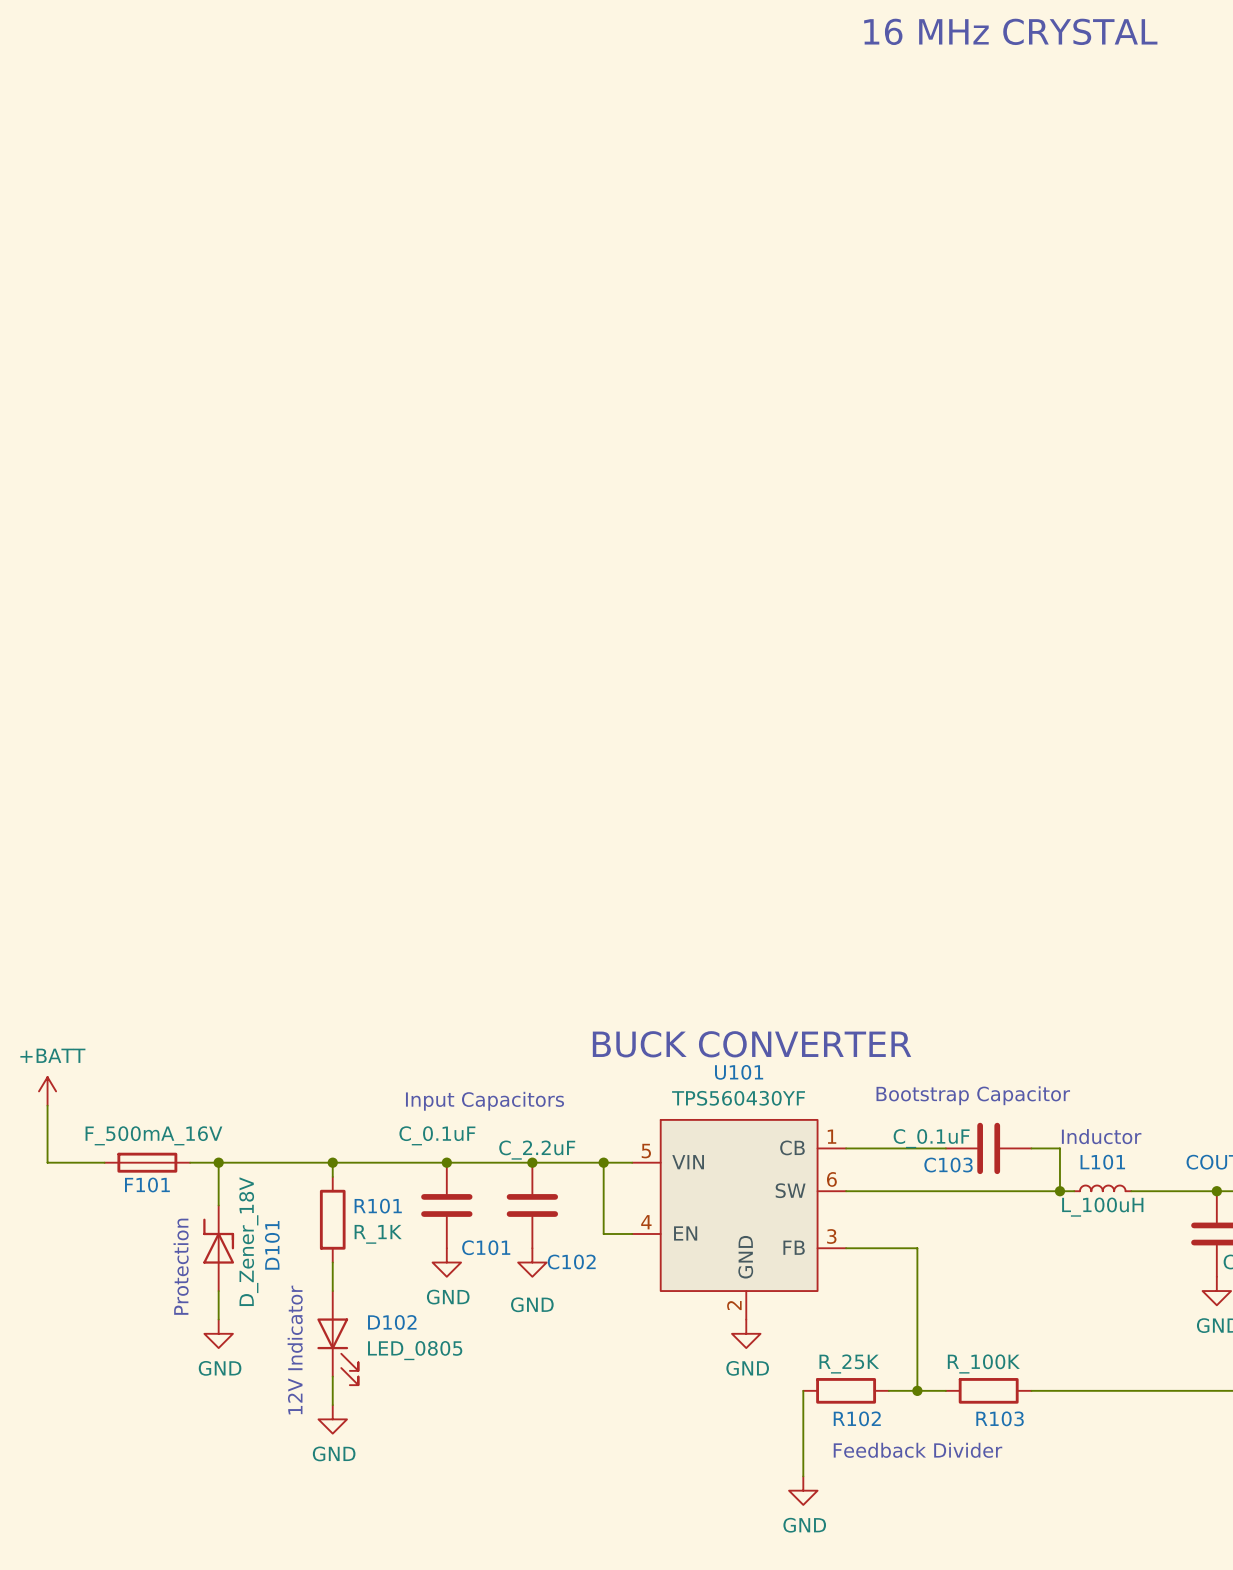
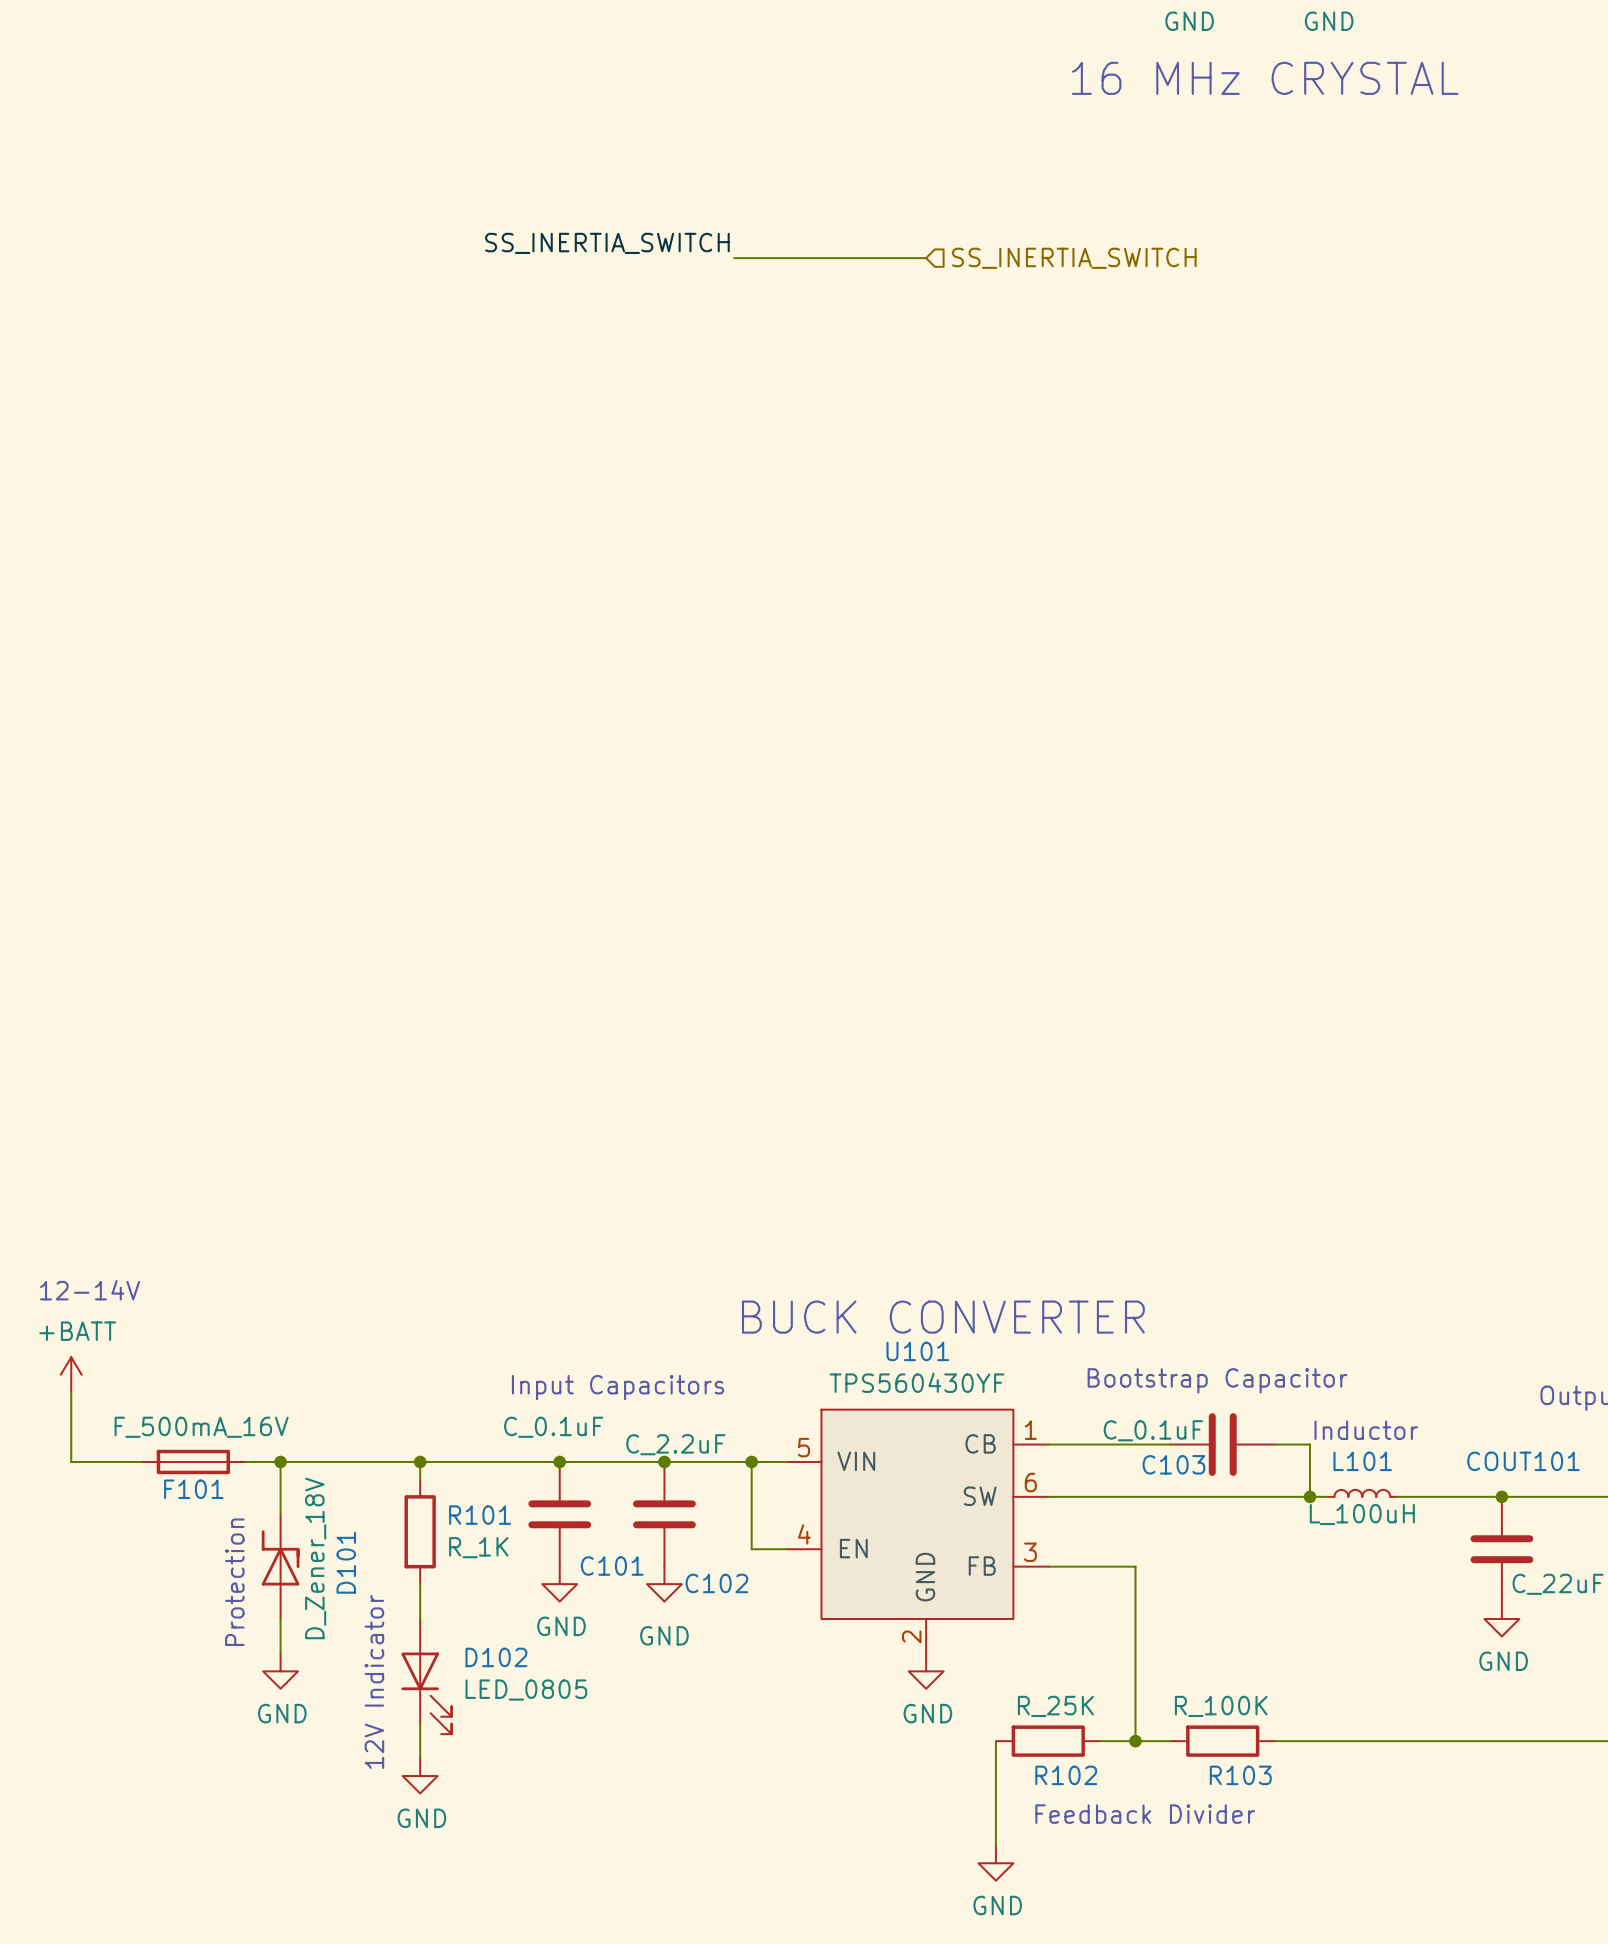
label: none -> SS_INERTIA_SWITCH (607, 243)
wire: none -> (734, 258) (926, 258)
hierarchical label: none -> SS_INERTIA_SWITCH (1074, 258)
text: none -> 12-14V (90, 1290)

